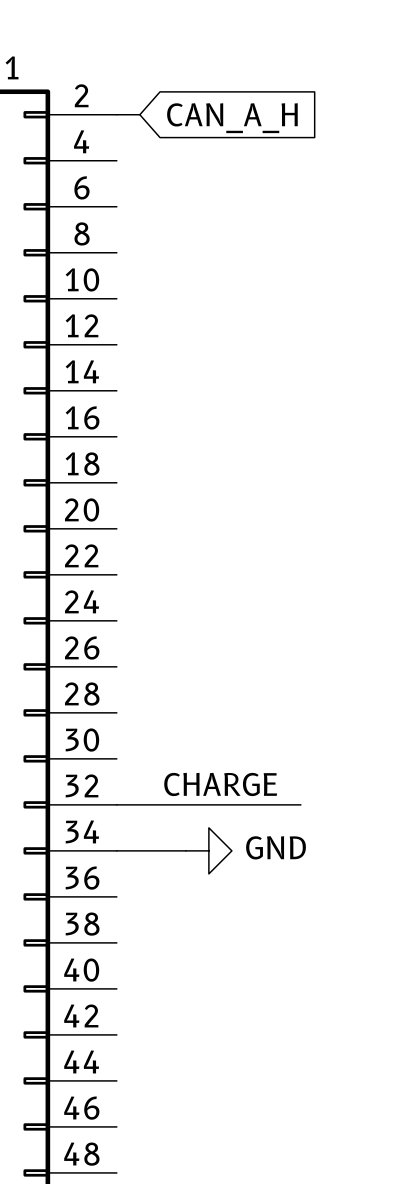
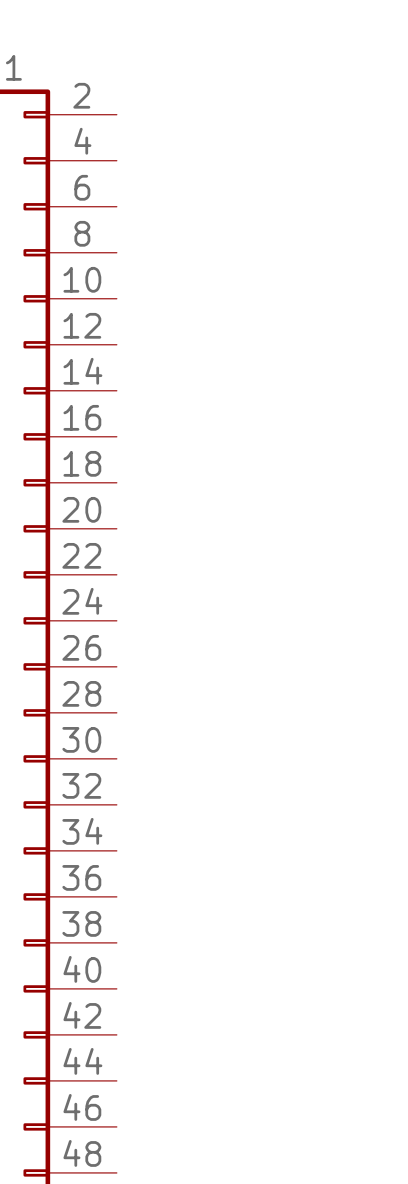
wire: (116, 114) (139, 114) -> none
global label: CAN_A_H (232, 118) -> none
label: CHARGE (220, 784) -> none
wire: (116, 804) (300, 804) -> none
wire: (116, 850) (185, 850) -> none
power symbol: GND (208, 850) -> none

